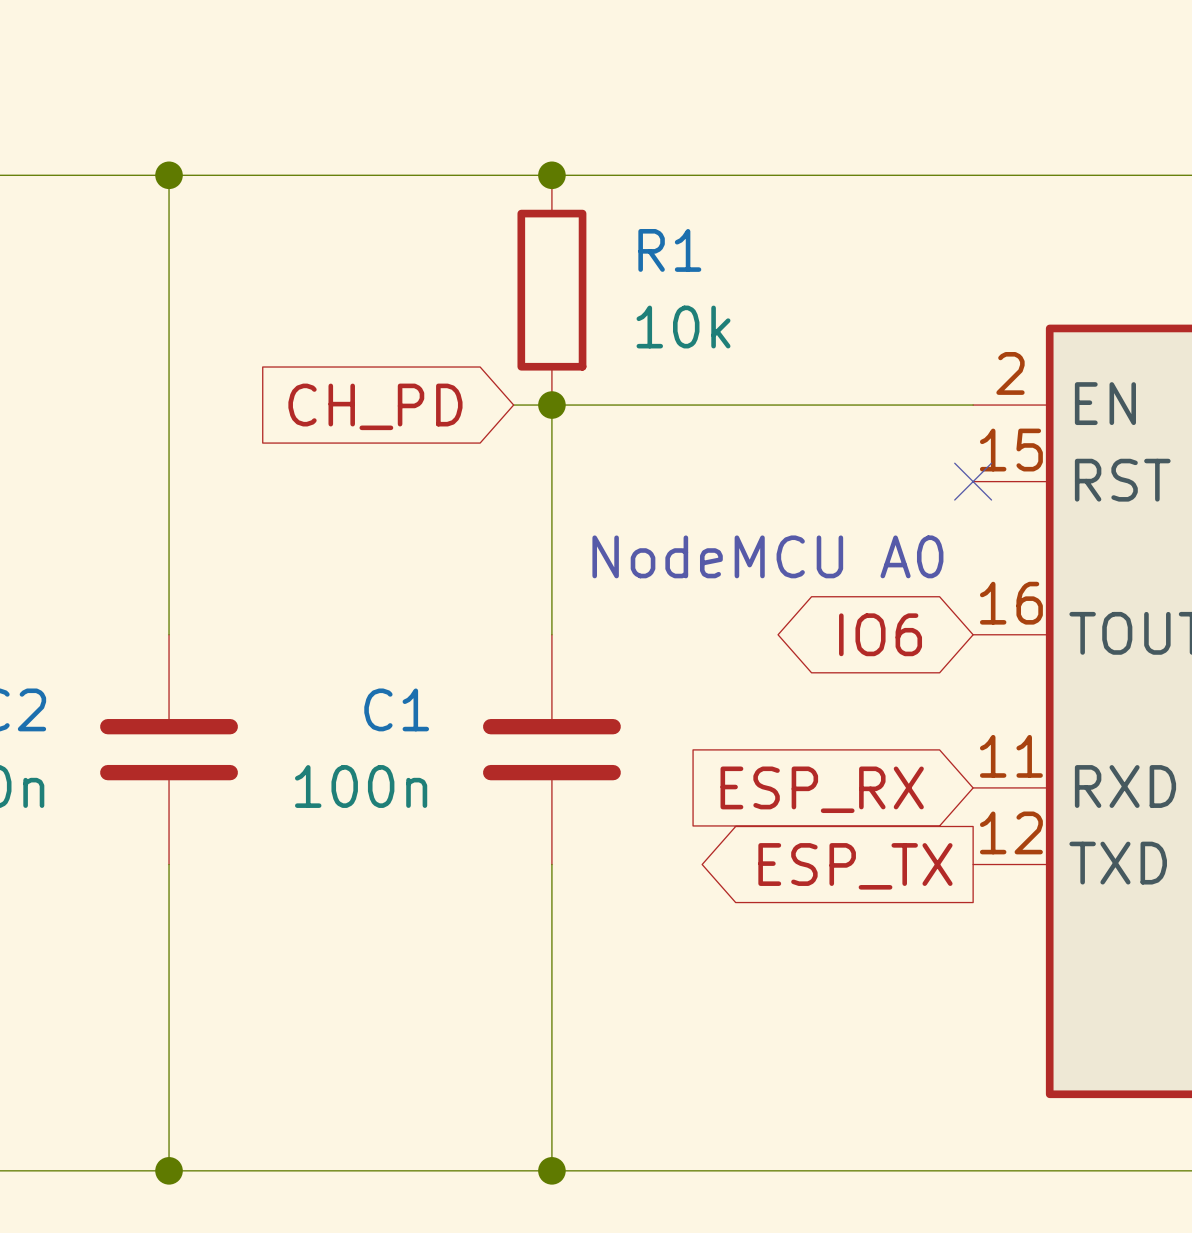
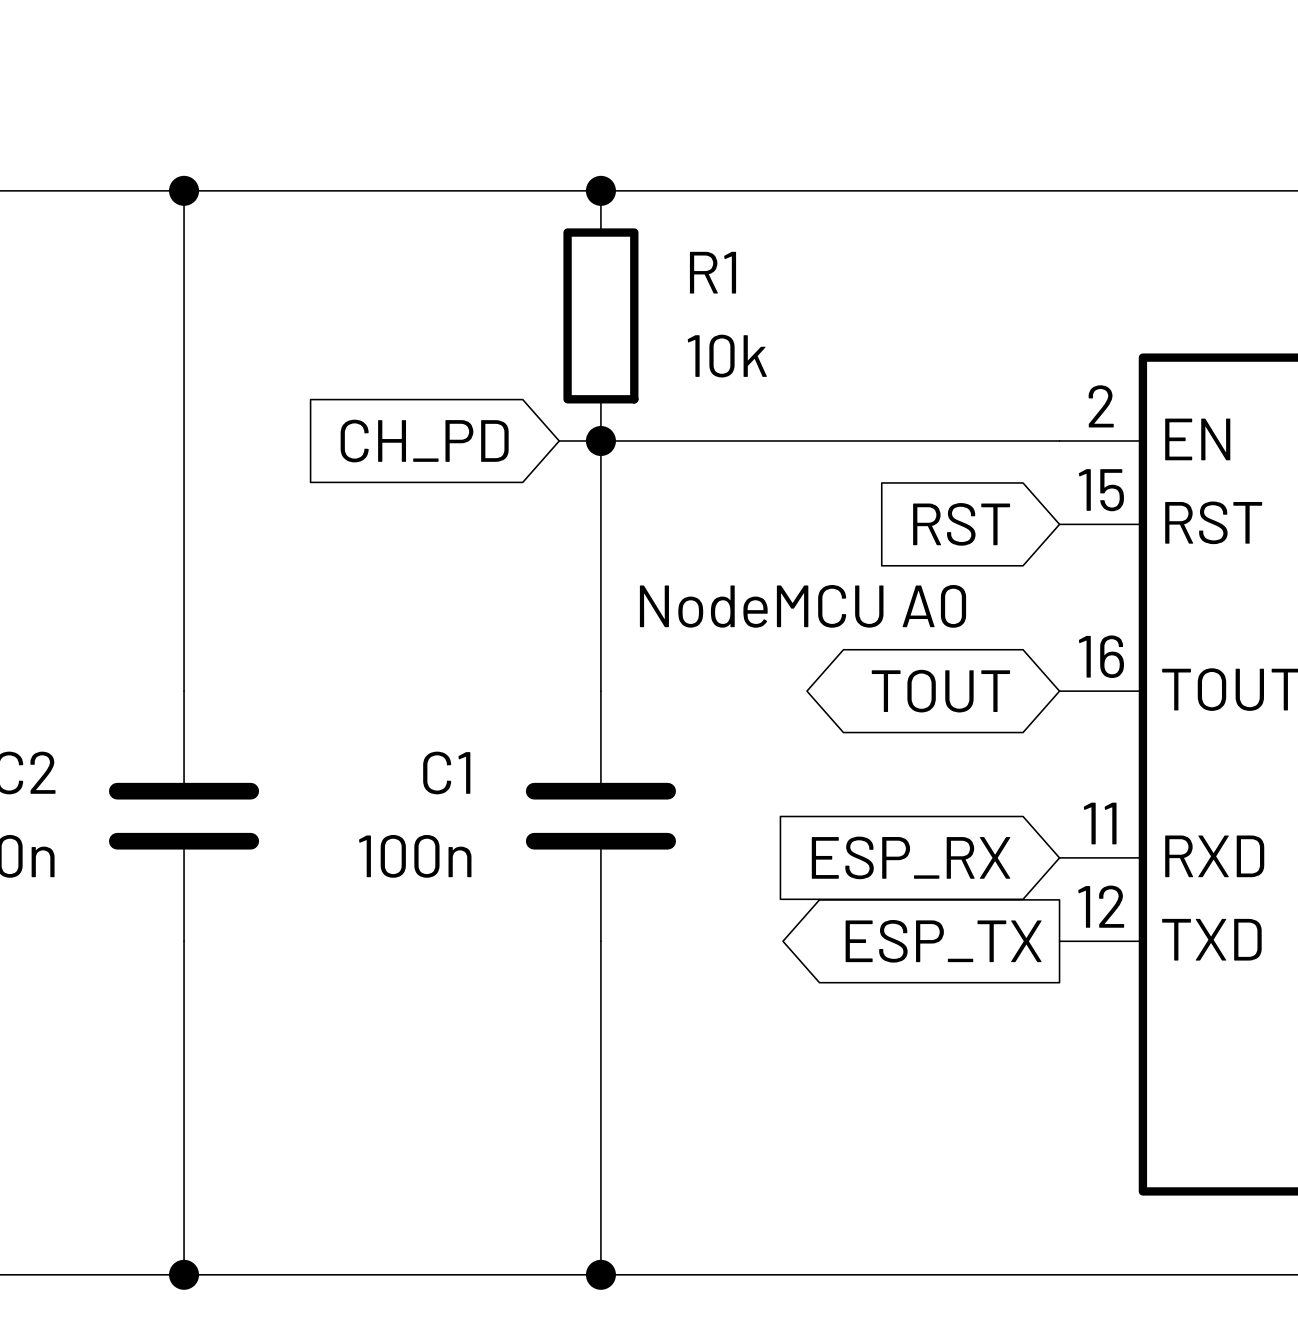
global label: none -> RST (961, 524)
no-connect mark: (973, 481) -> none
global label: IO6 (880, 634) -> TOUT (940, 691)

